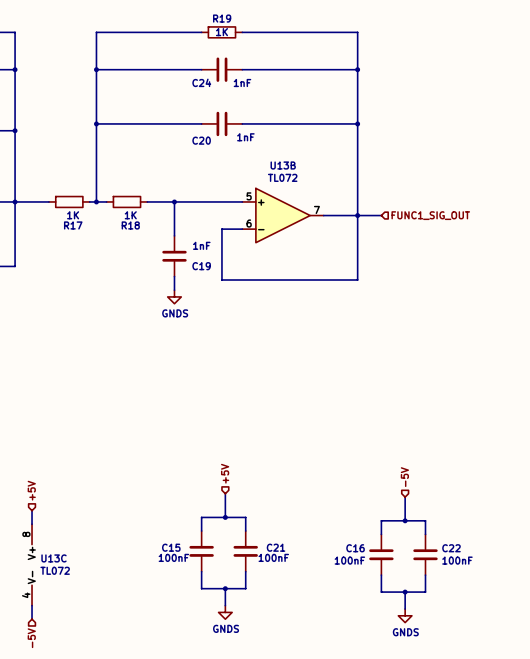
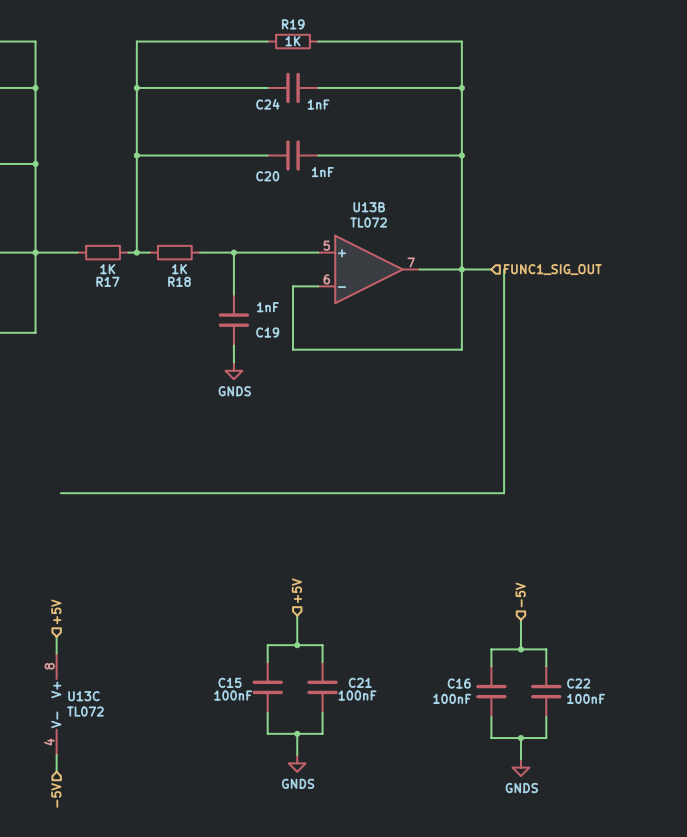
wire: none -> (504, 269) (504, 493) (60, 493)

